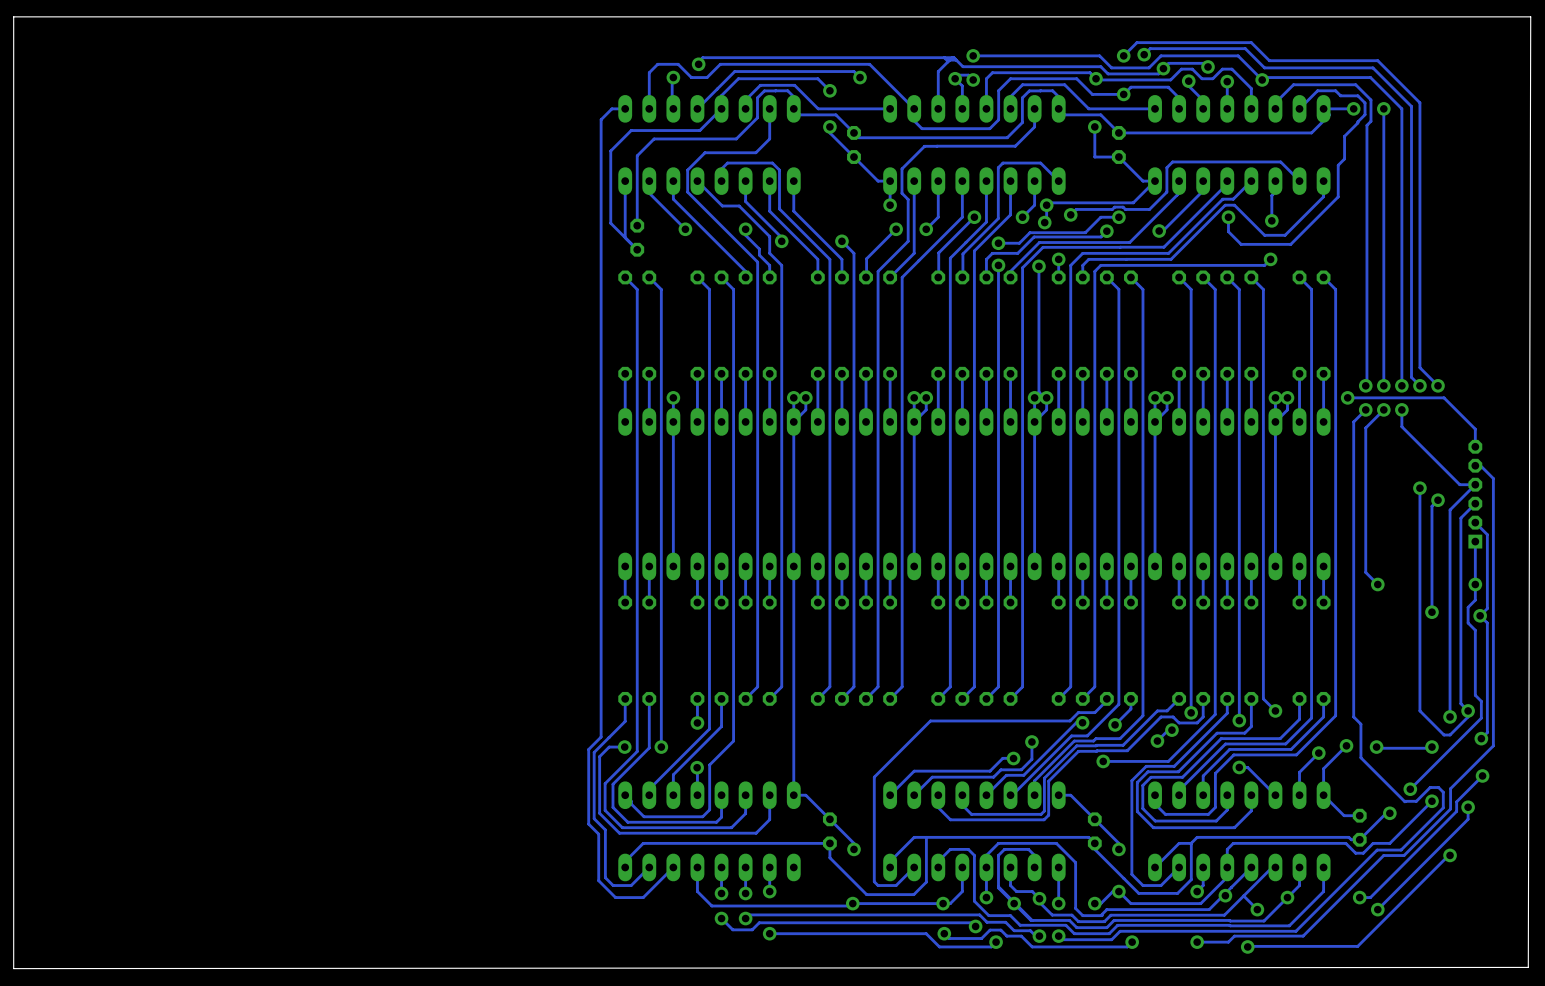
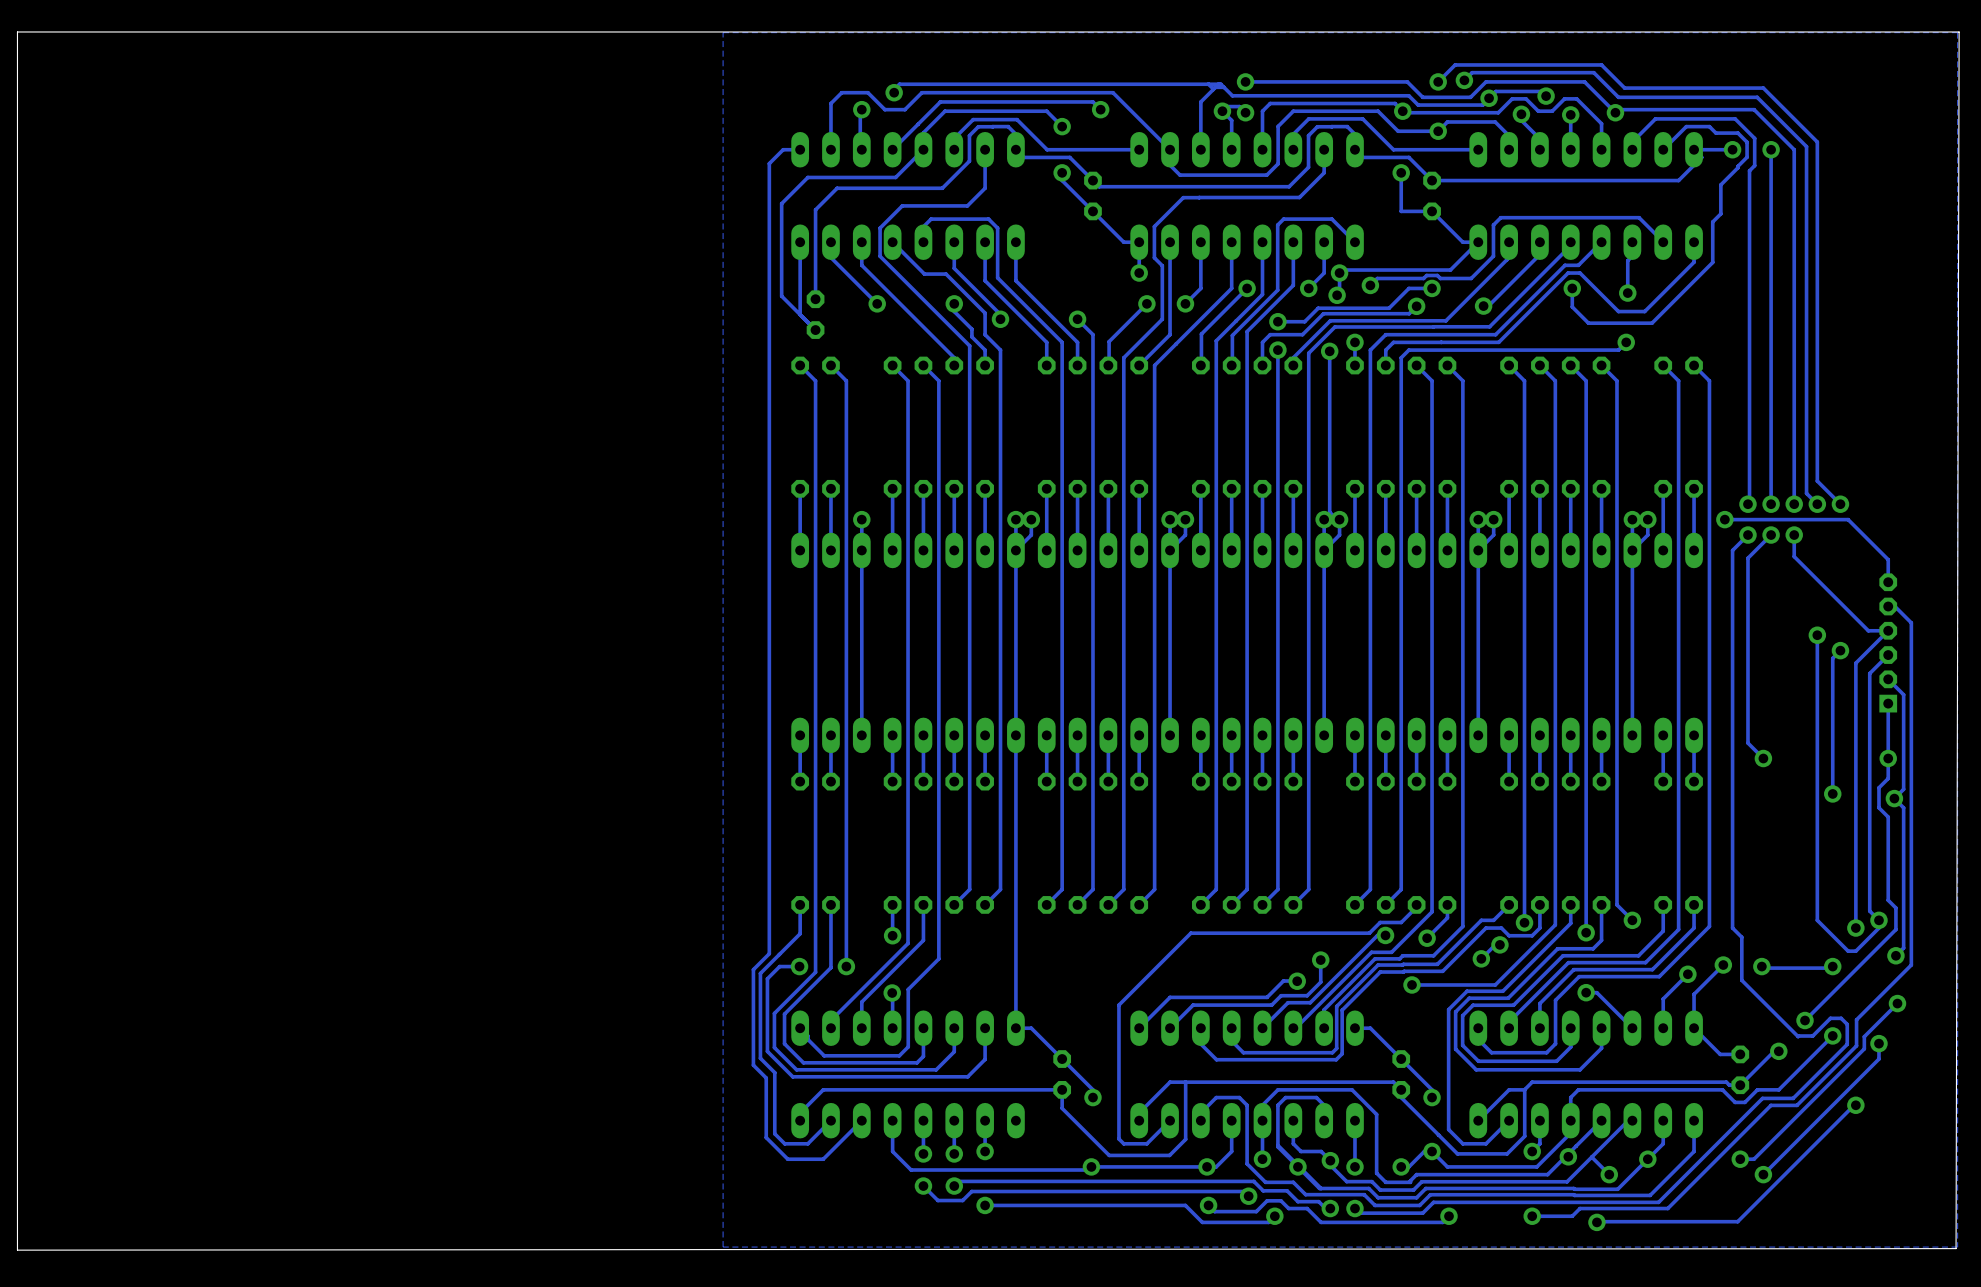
zone outline: none -> (1957, 32) (1957, 1247) (723, 1247) (723, 32) (1957, 32)

